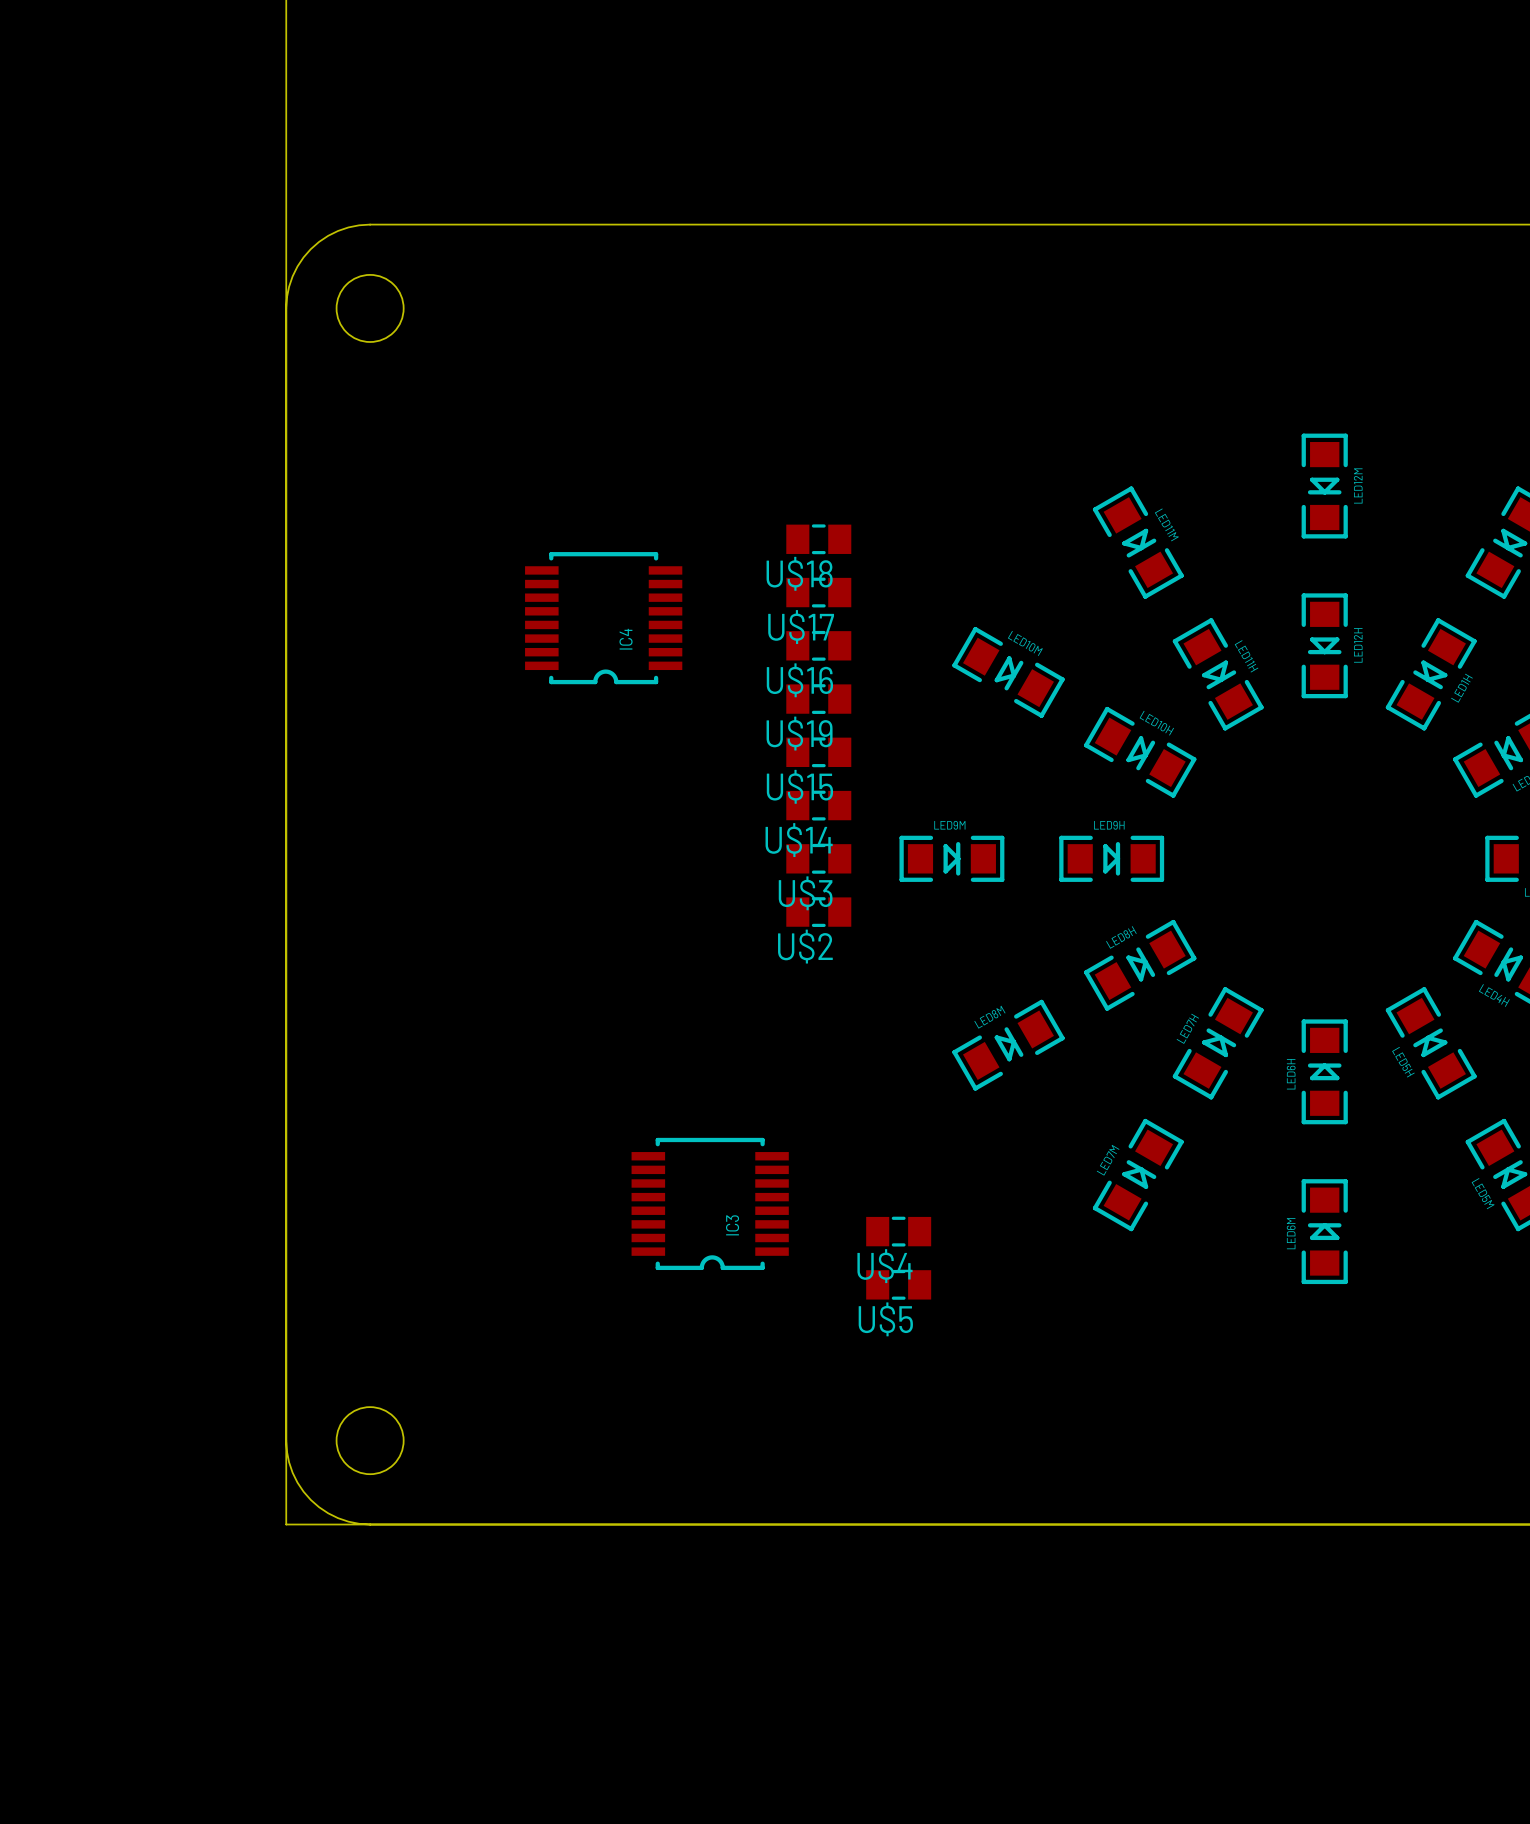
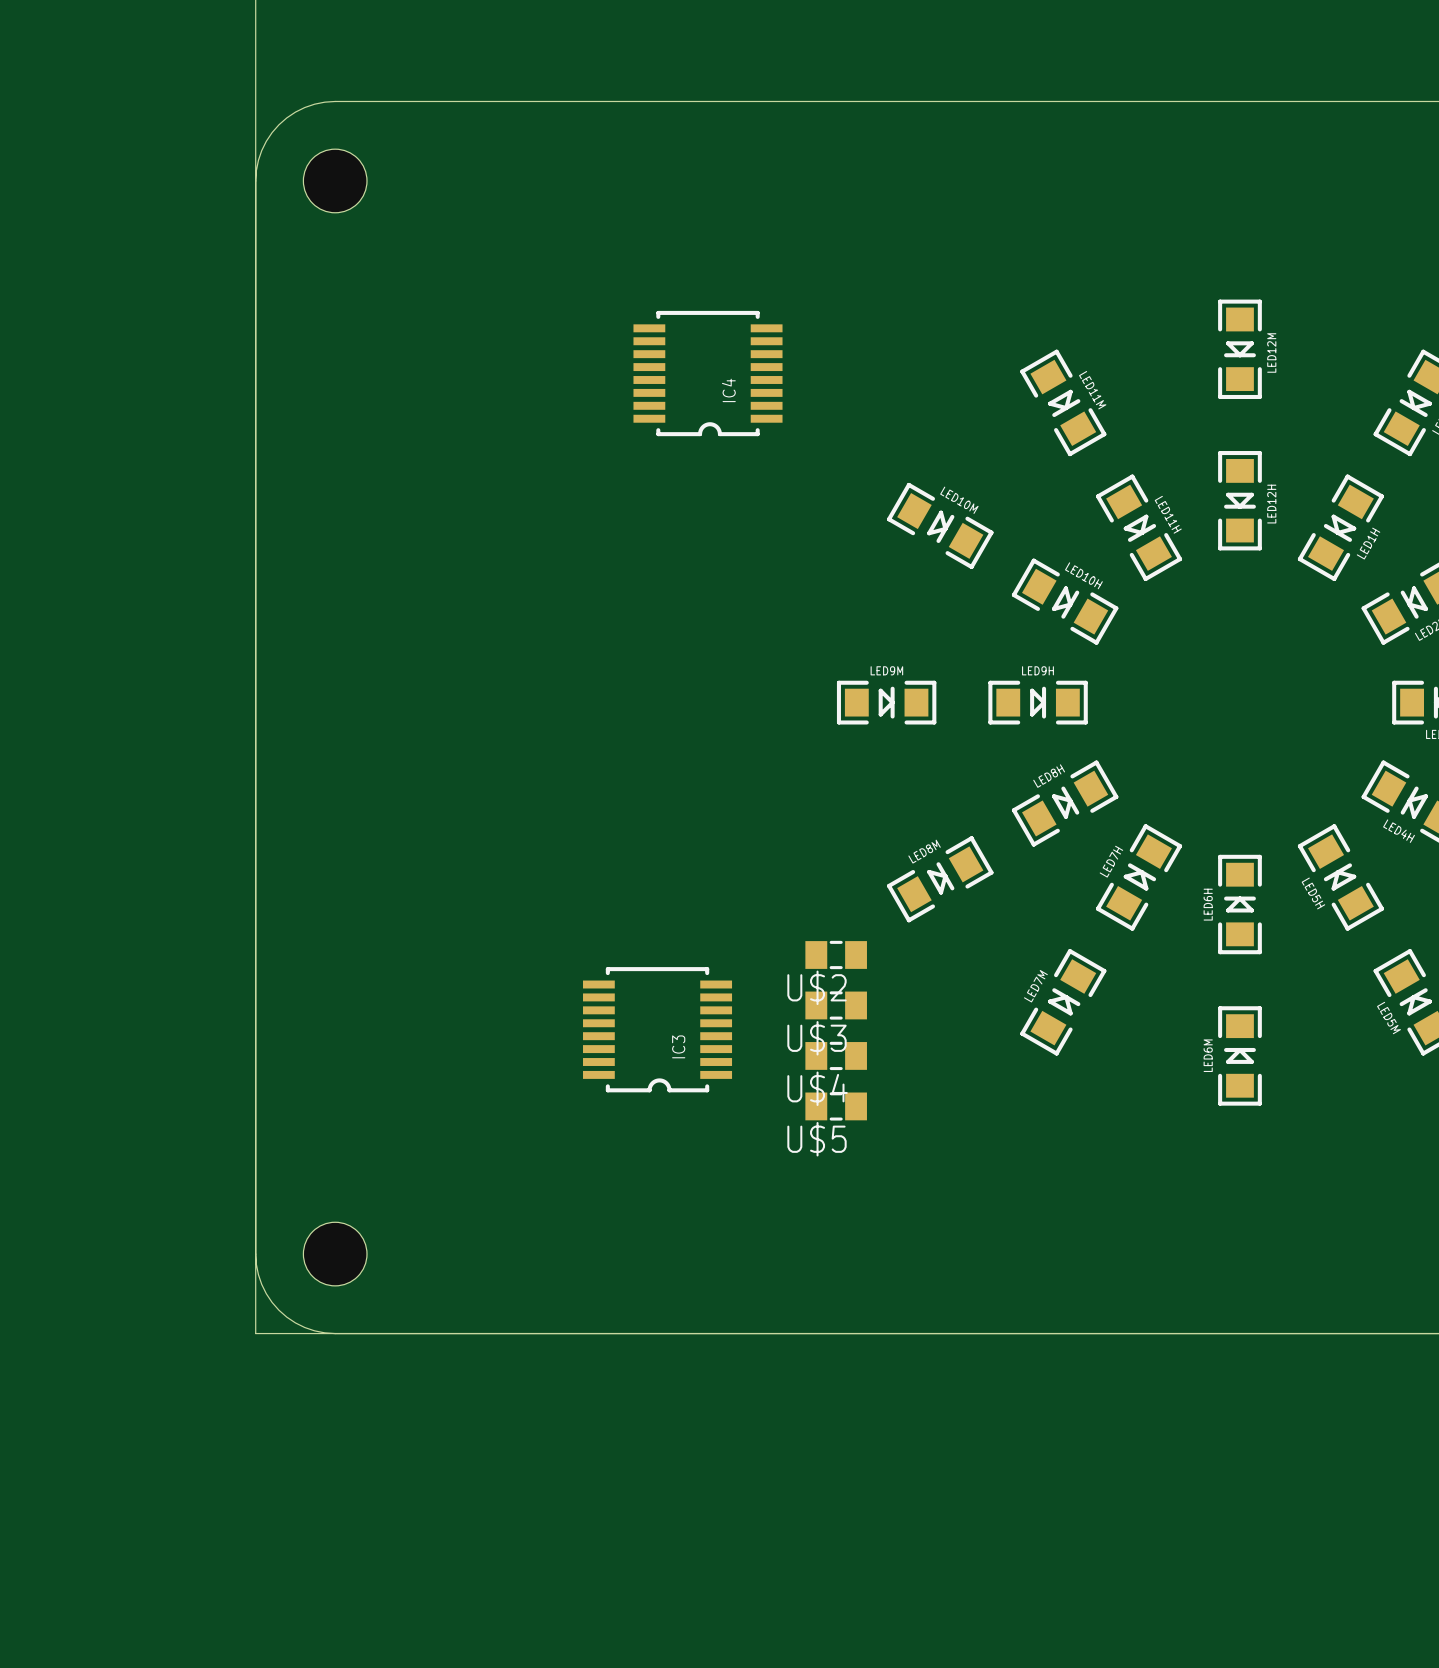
U$18: (818, 539) -> none
U$17: (818, 592) -> none
IC4 position: (603, 618) -> (708, 373)
U$16: (818, 645) -> none
U$19: (818, 699) -> none
U$15: (818, 752) -> none
U$14: (818, 805) -> none
U$3 position: (818, 858) -> (836, 1005)
U$2 position: (818, 912) -> (836, 954)

